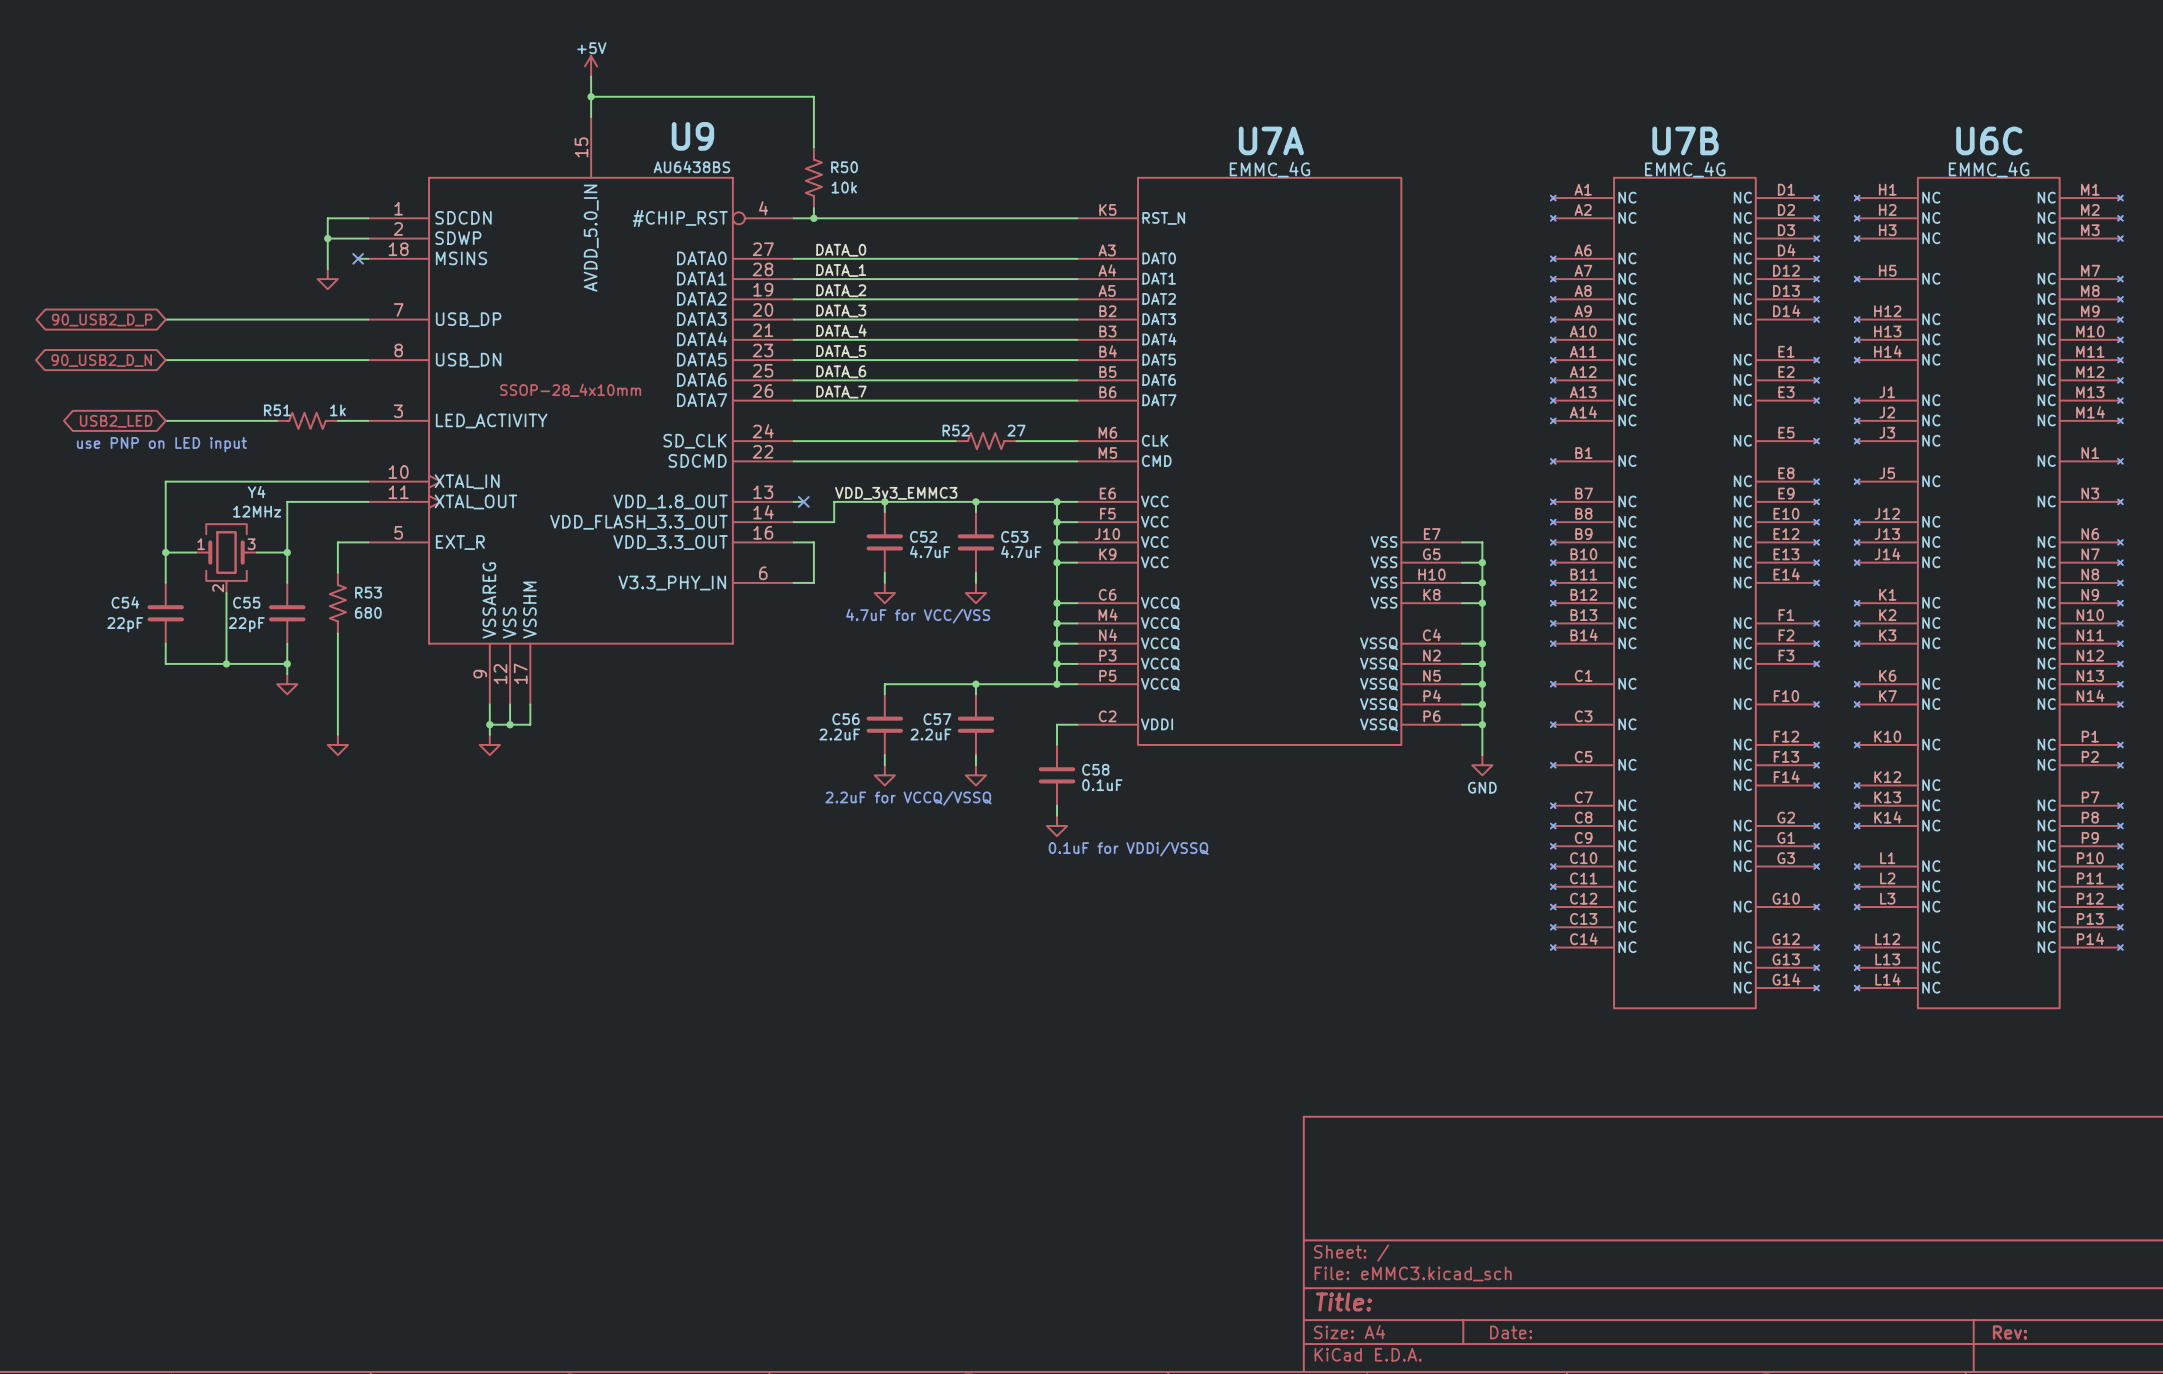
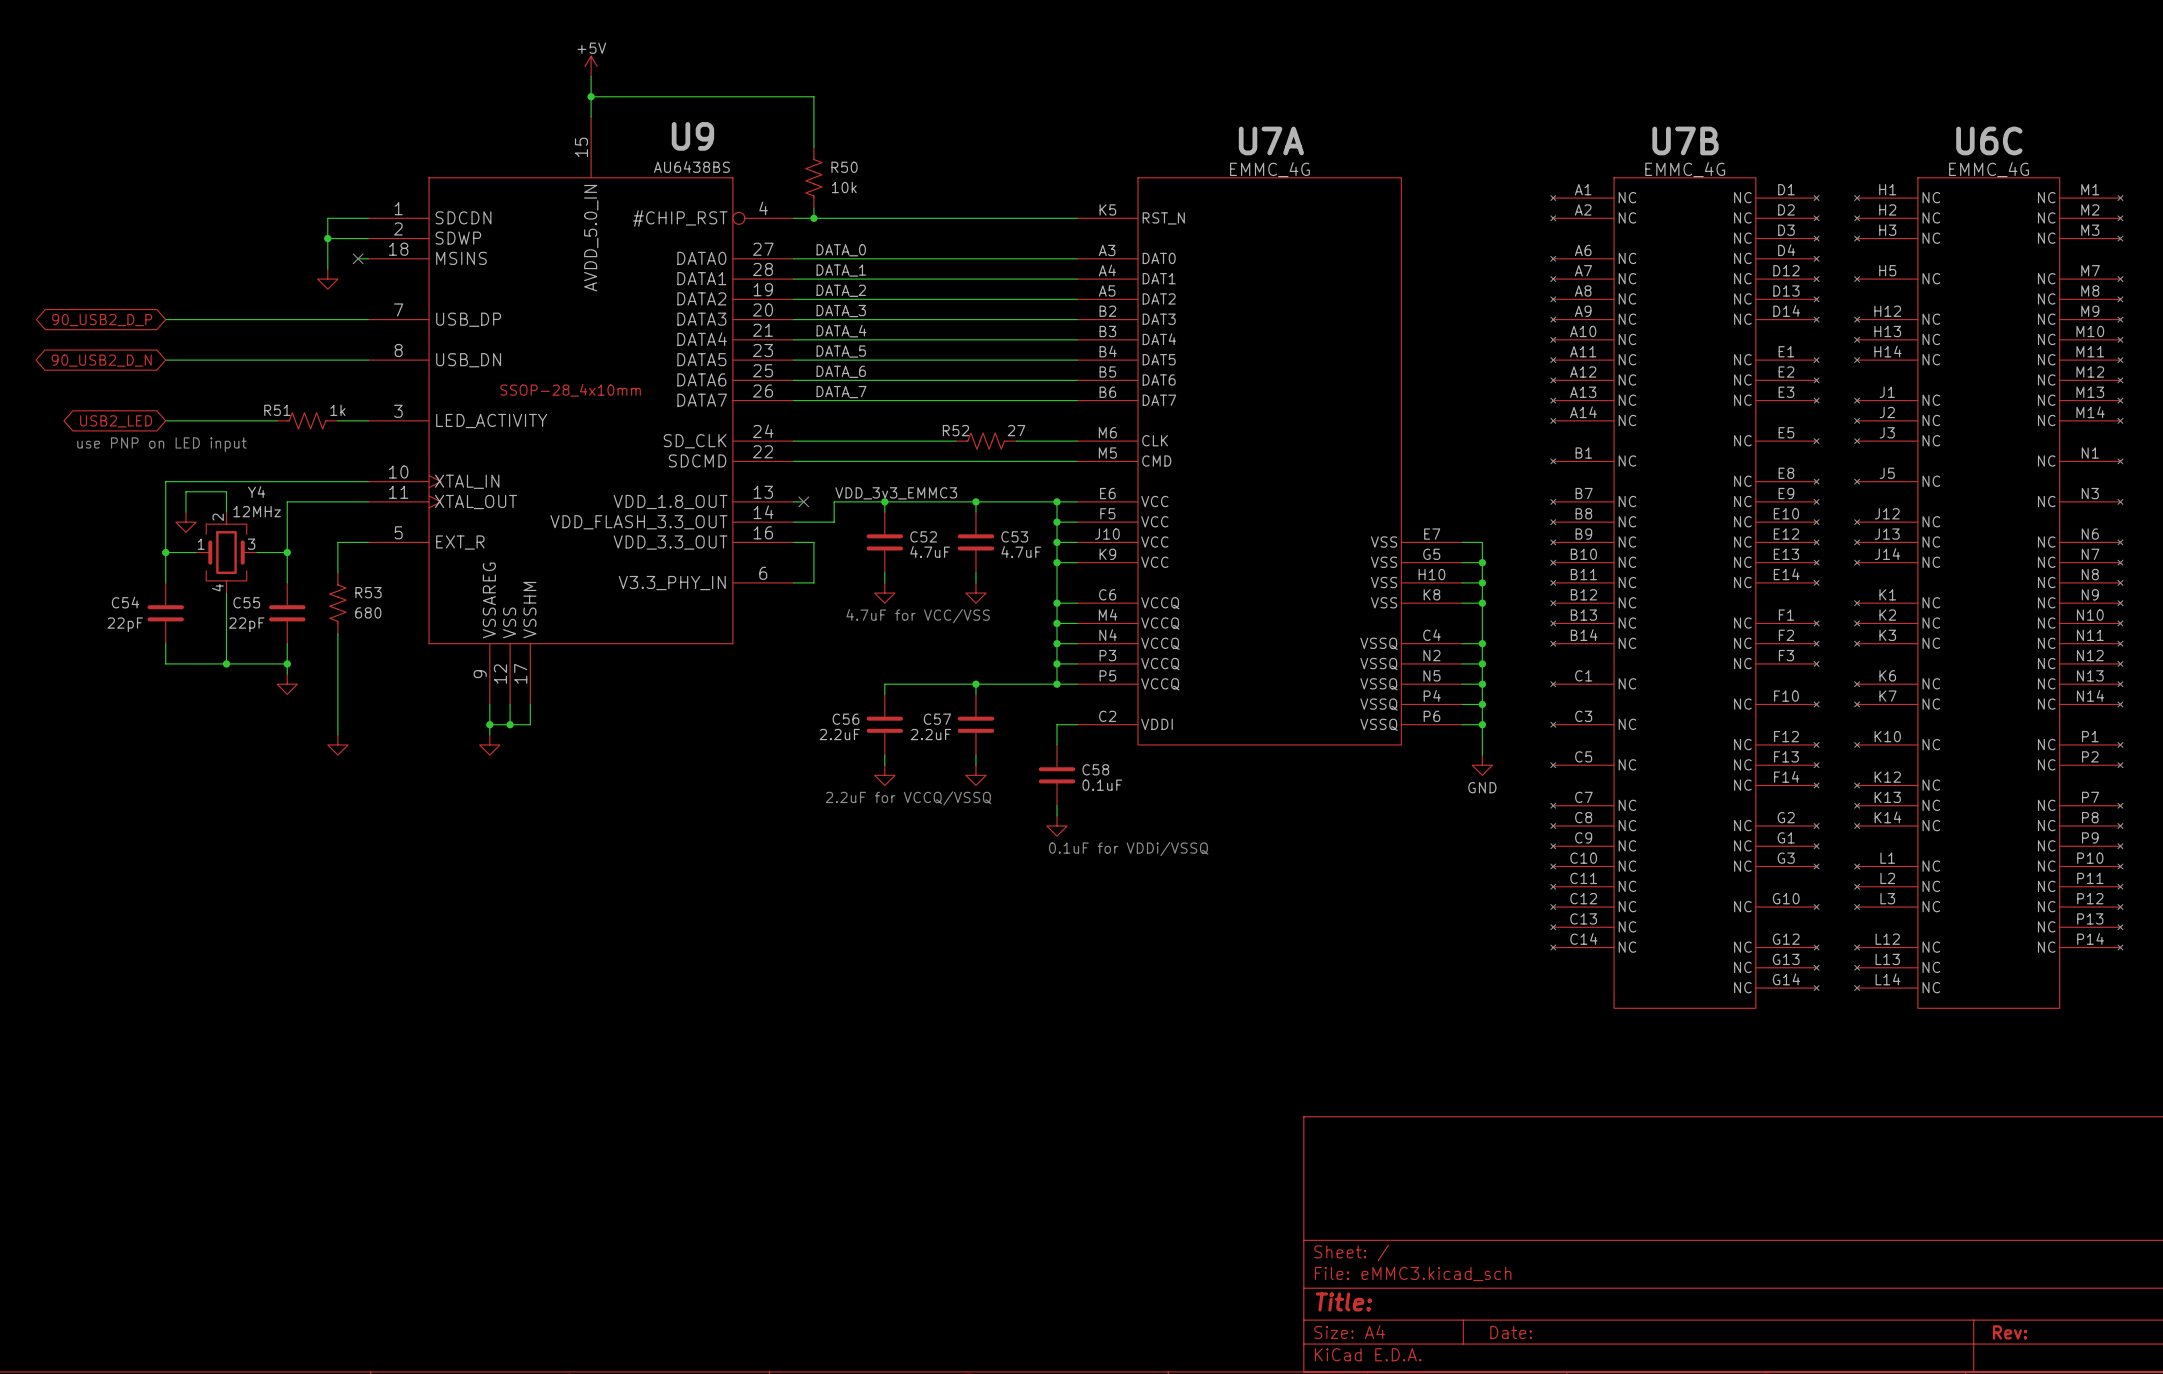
wire: none -> (185, 512) (185, 491) (226, 491) (226, 512)
power symbol: none -> (185, 522)
Y4 symbol: [196, 524, 257, 594] -> [196, 512, 257, 594]

